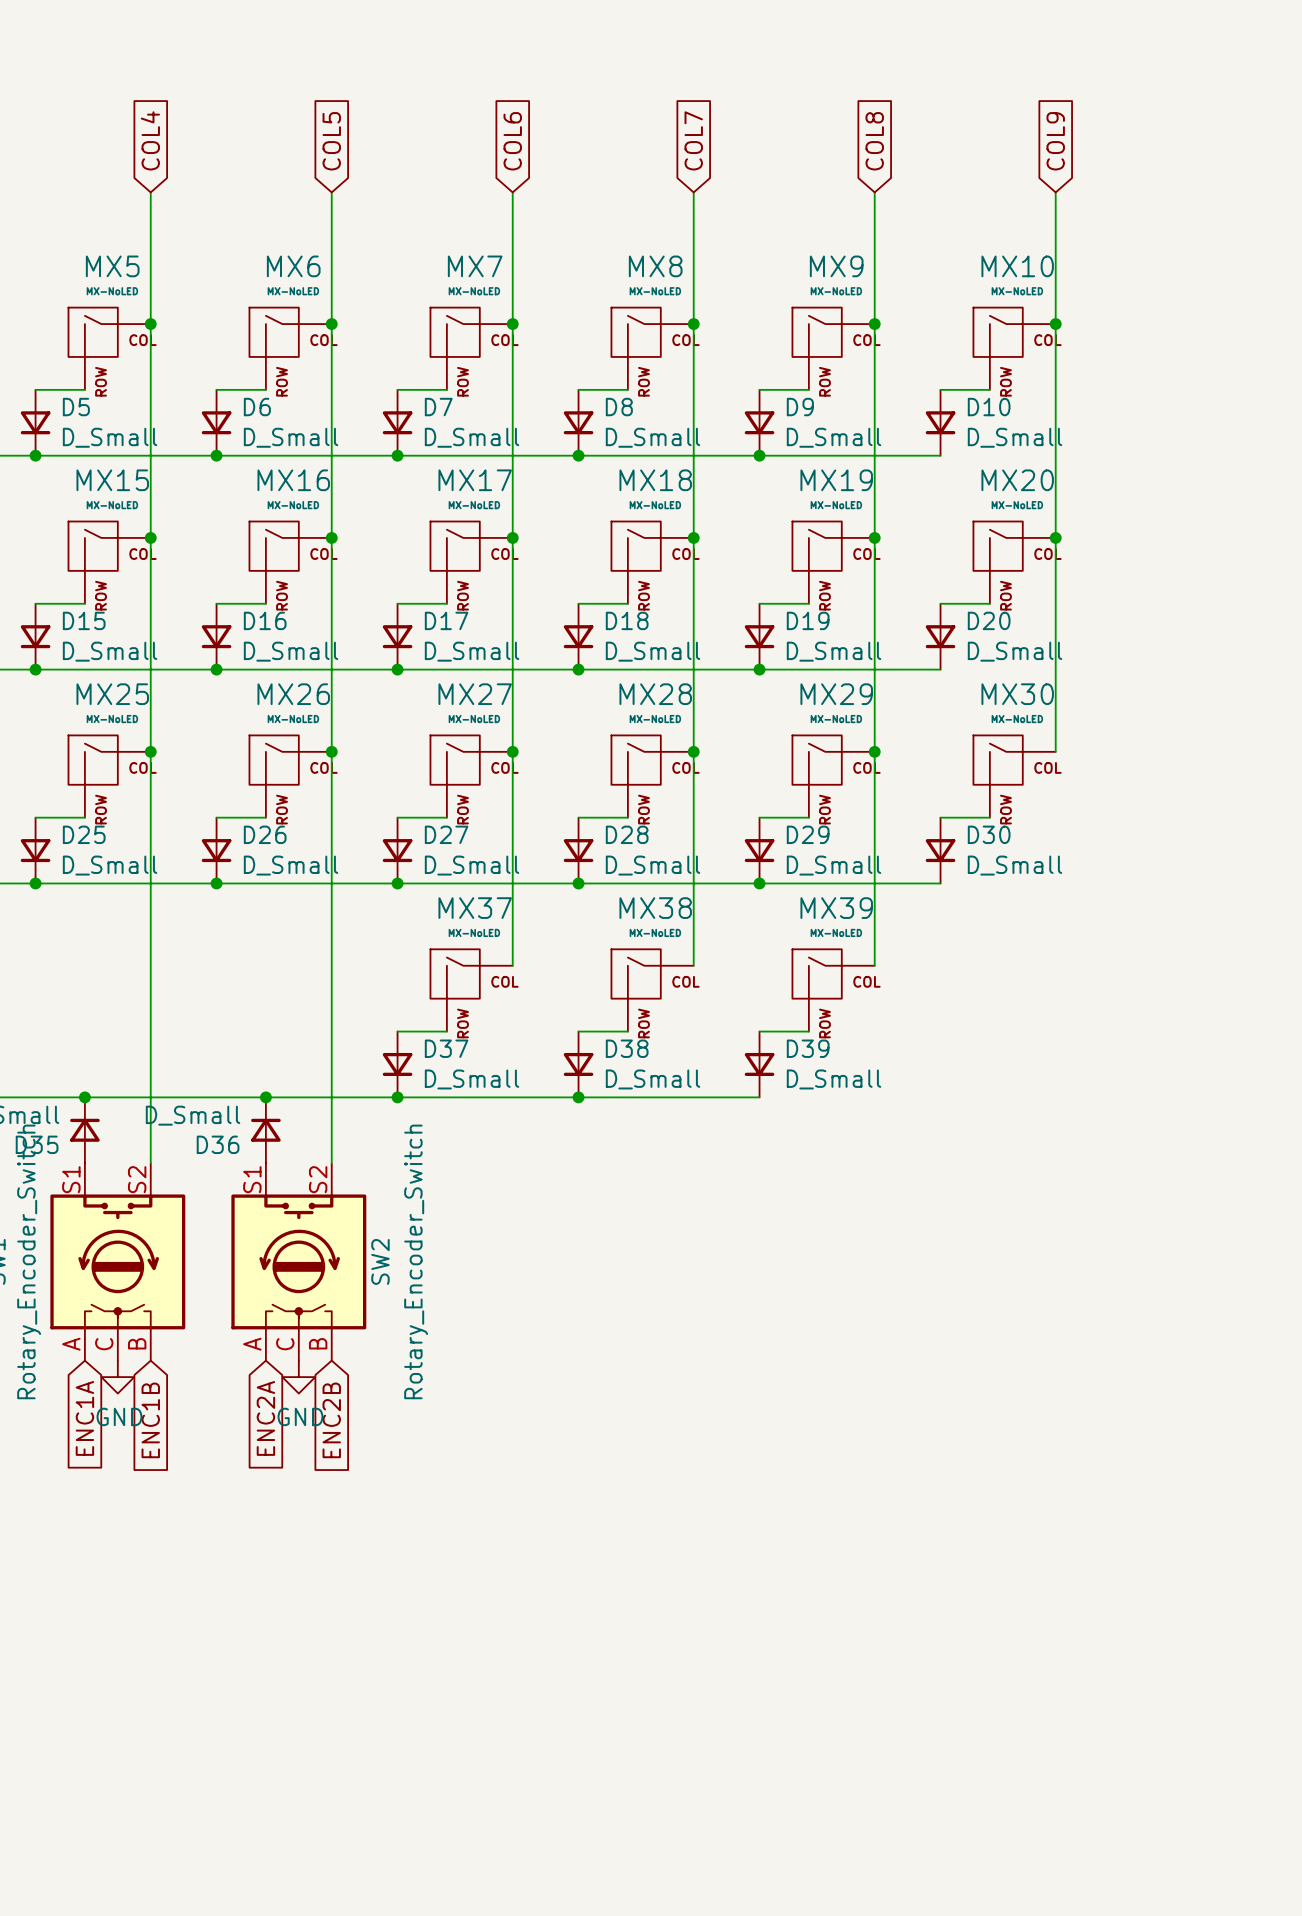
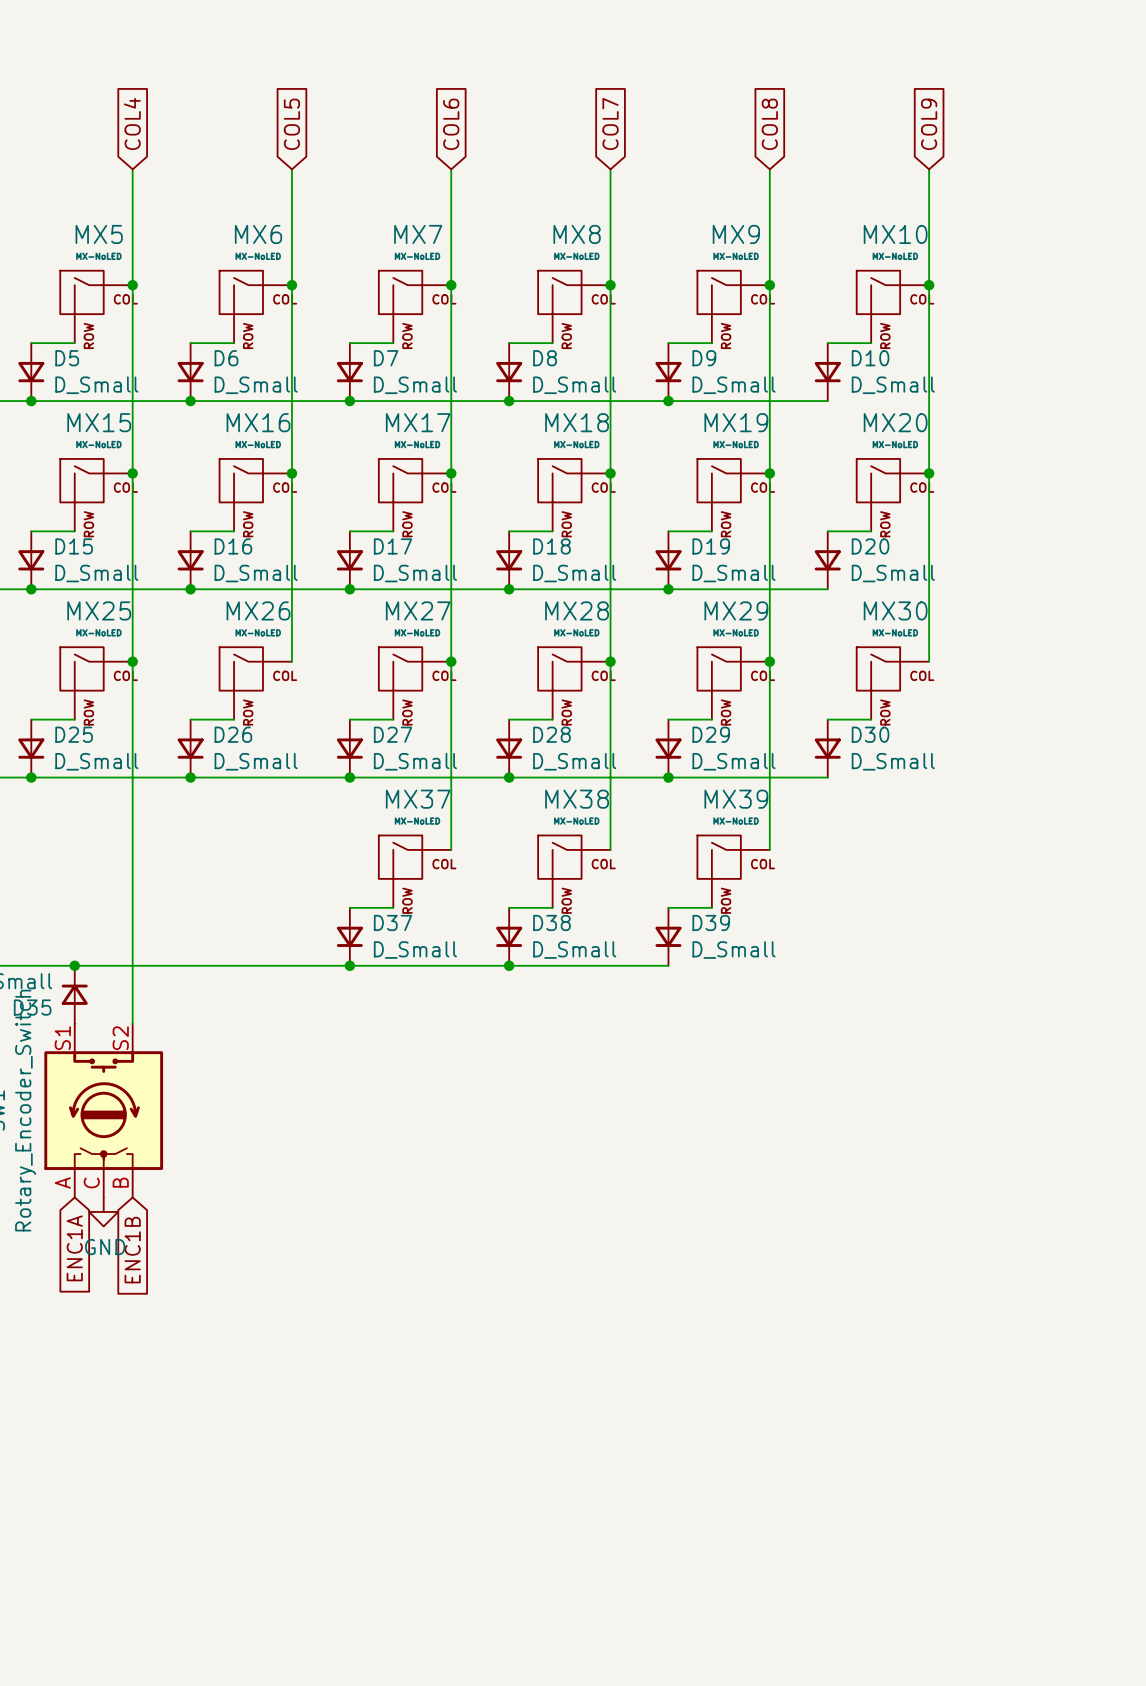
wire: (331, 751) (331, 1163) -> none
junction: (331, 751) -> none
junction: (265, 1097) -> none
D36: D_Small (265, 1130) -> none
SW2: Rotary_Encoder_Switch (298, 1261) -> none
power symbol: GND (298, 1377) -> none
global label: ENC2A (265, 1418) -> none
global label: ENC2B (331, 1420) -> none

